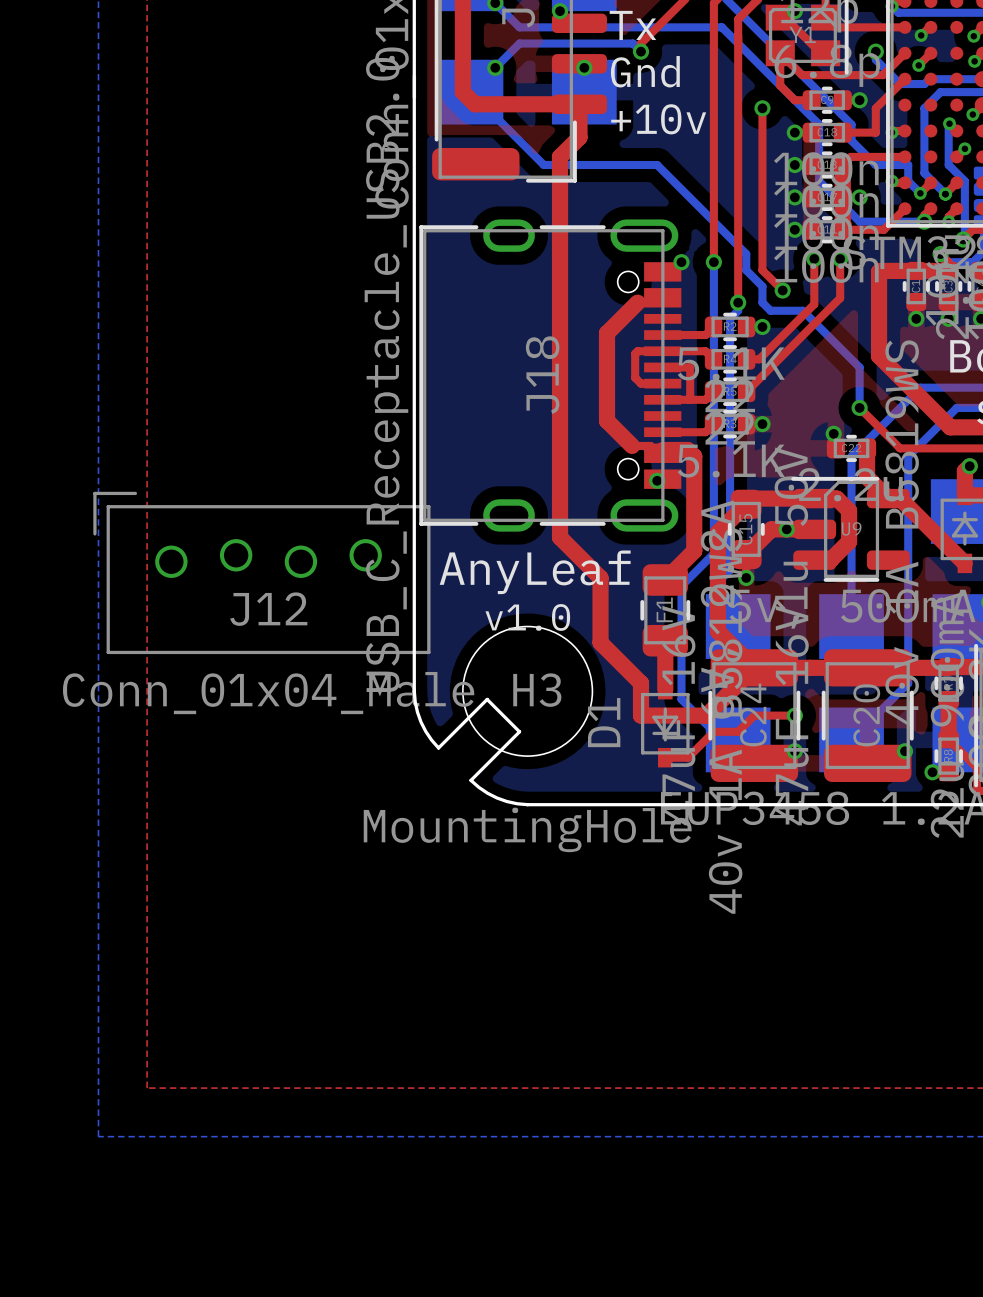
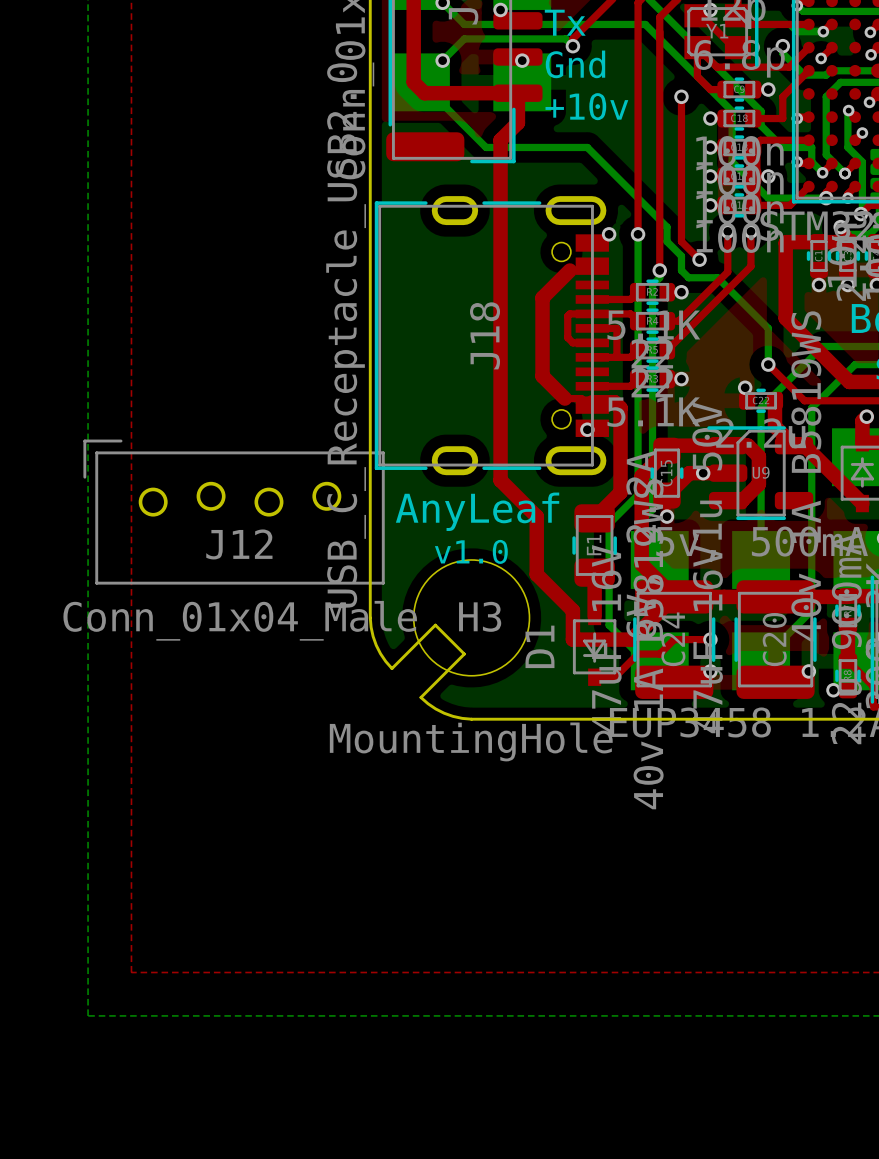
bottom track: none -> (790, 24) (797, 31) (823, 31)

